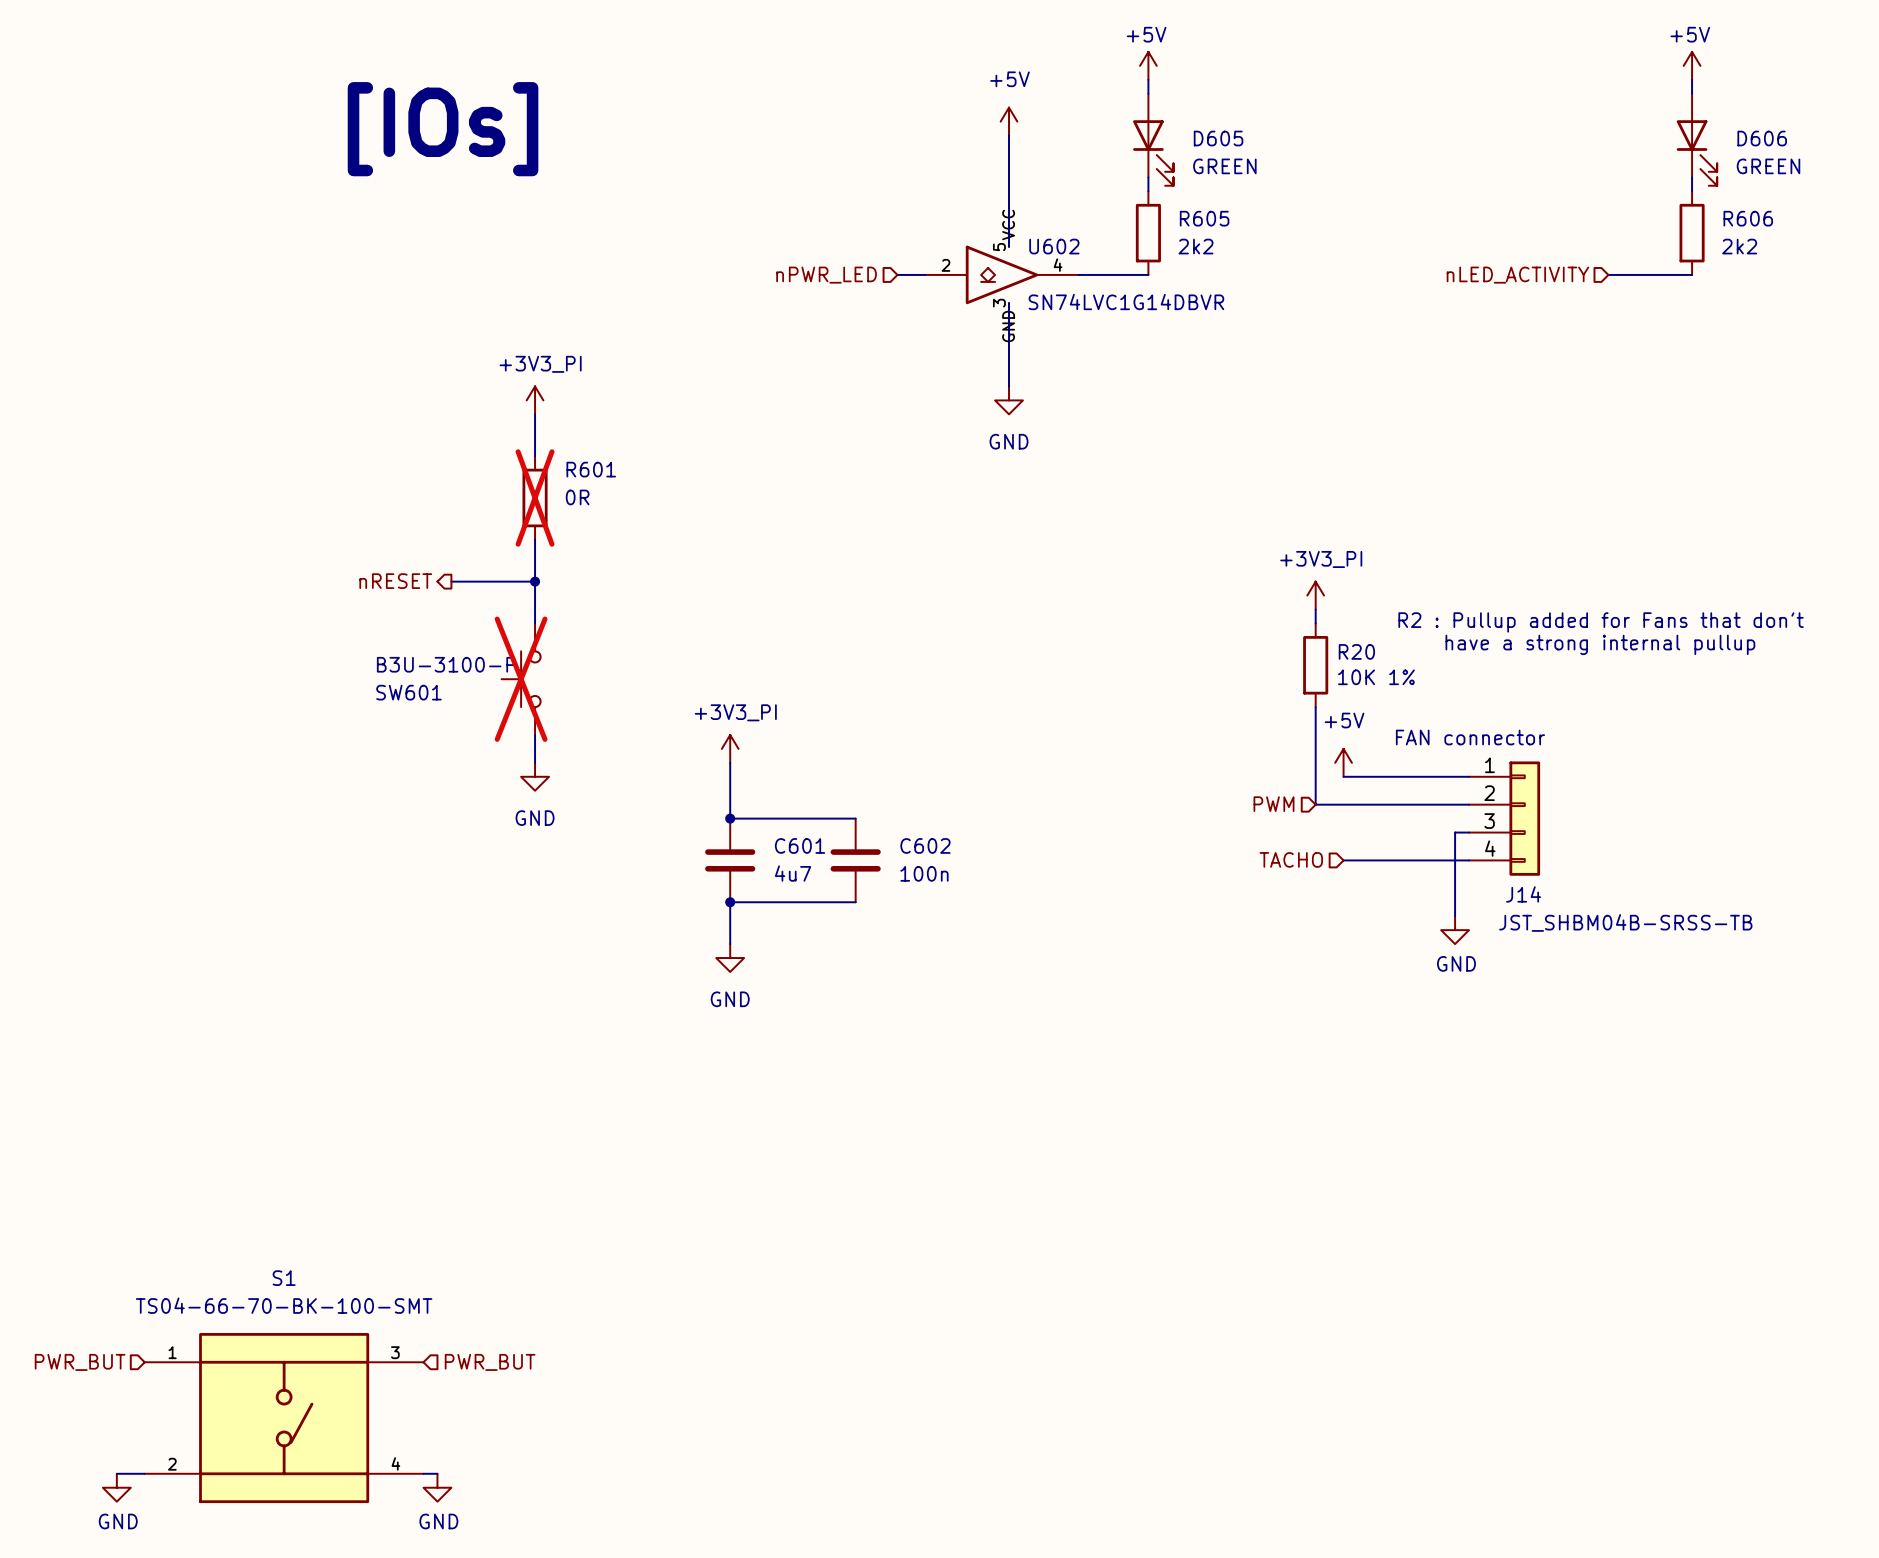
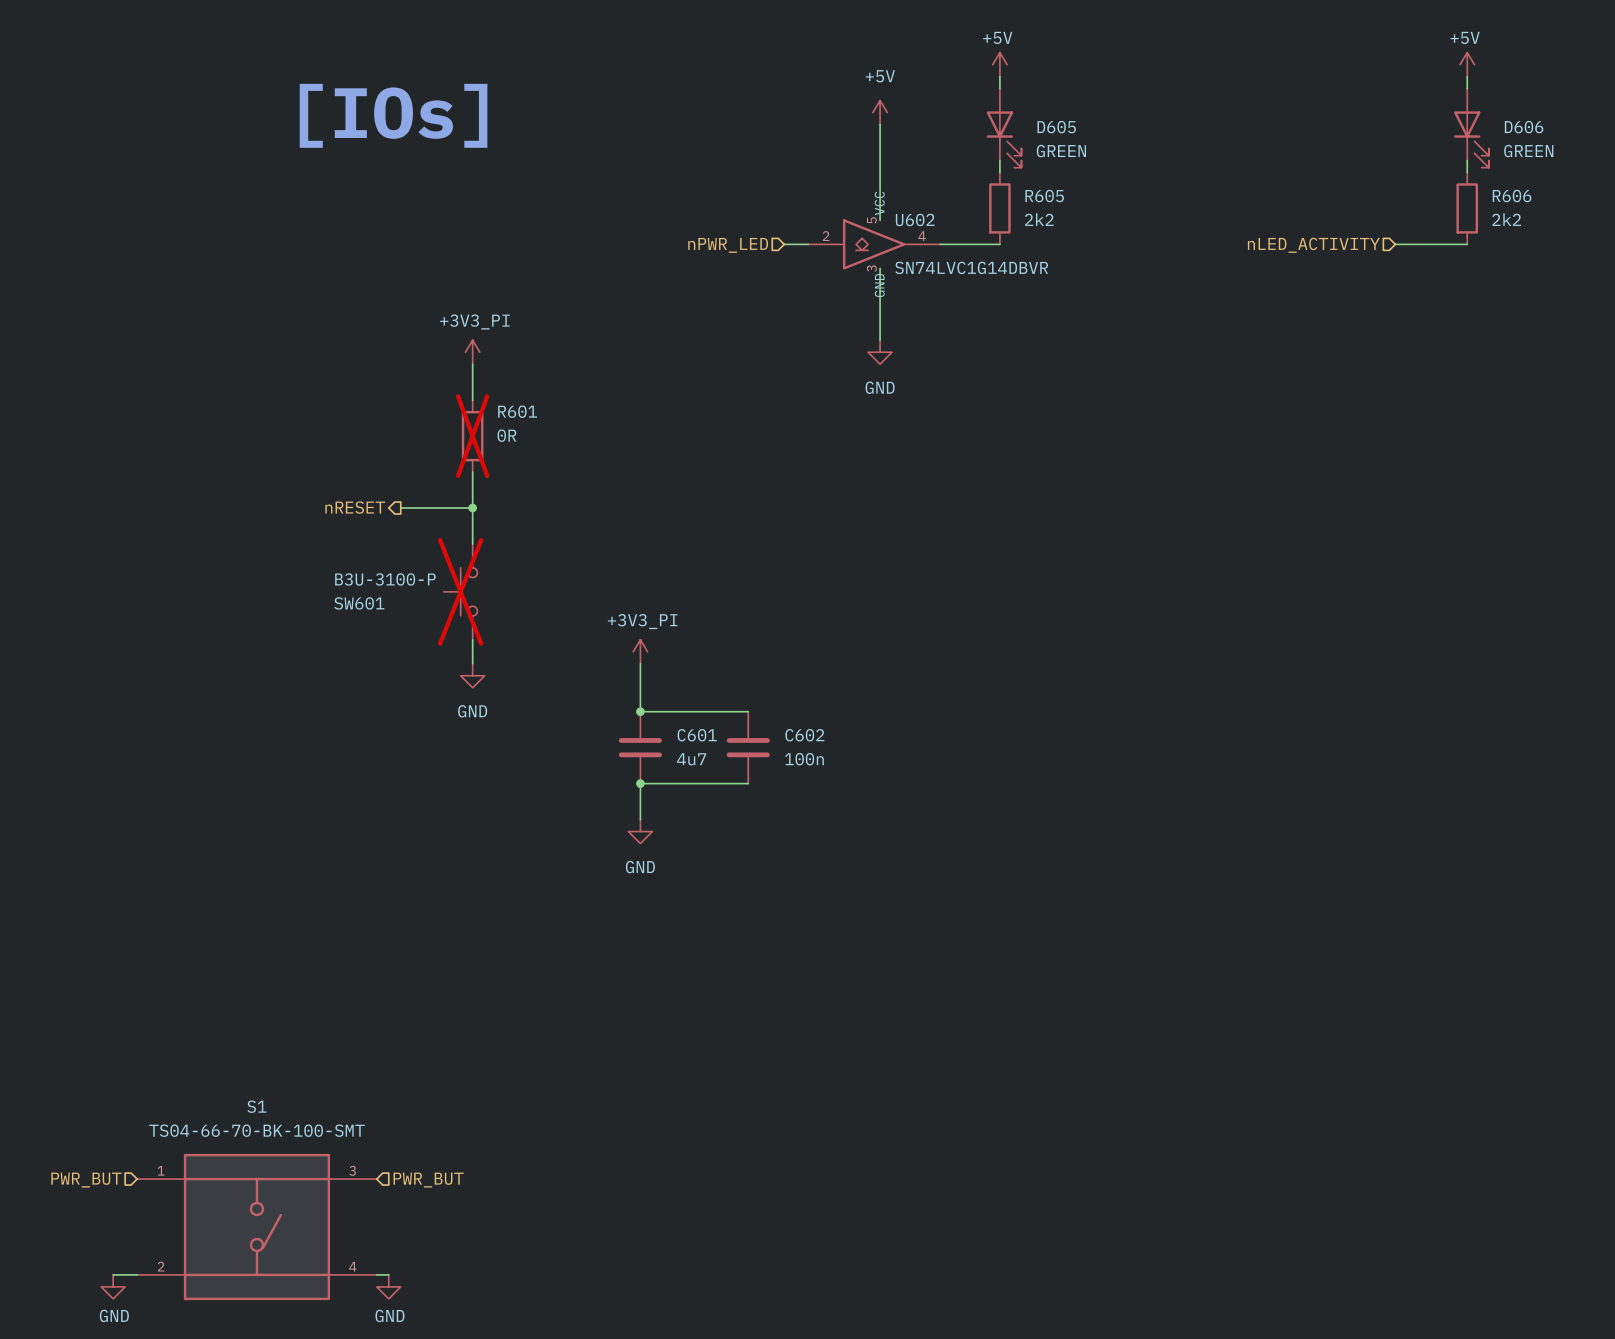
power symbol: +3V3_PI (1315, 595) -> none
wire: (1315, 609) (1315, 623) -> none
text: R2 : Pullup added for Fans that don't (1601, 622) -> none
text: have a strong internal pullup (1600, 644) -> none
R20: 10K 1% (1315, 665) -> none
wire: (1315, 707) (1315, 804) (1469, 804) -> none
text: FAN connector (1470, 737) -> none
power symbol: +5V (1343, 762) -> none
wire: (1343, 776) (1469, 776) -> none
hierarchical label: PWM (1273, 804) -> none
J14: JST_SHBM04B-SRSS-TB (1504, 818) -> none
wire: (1469, 832) (1455, 832) (1455, 916) -> none
hierarchical label: TACHO (1291, 859) -> none
wire: (1343, 860) (1469, 860) -> none
power symbol: GND (1455, 930) -> none

